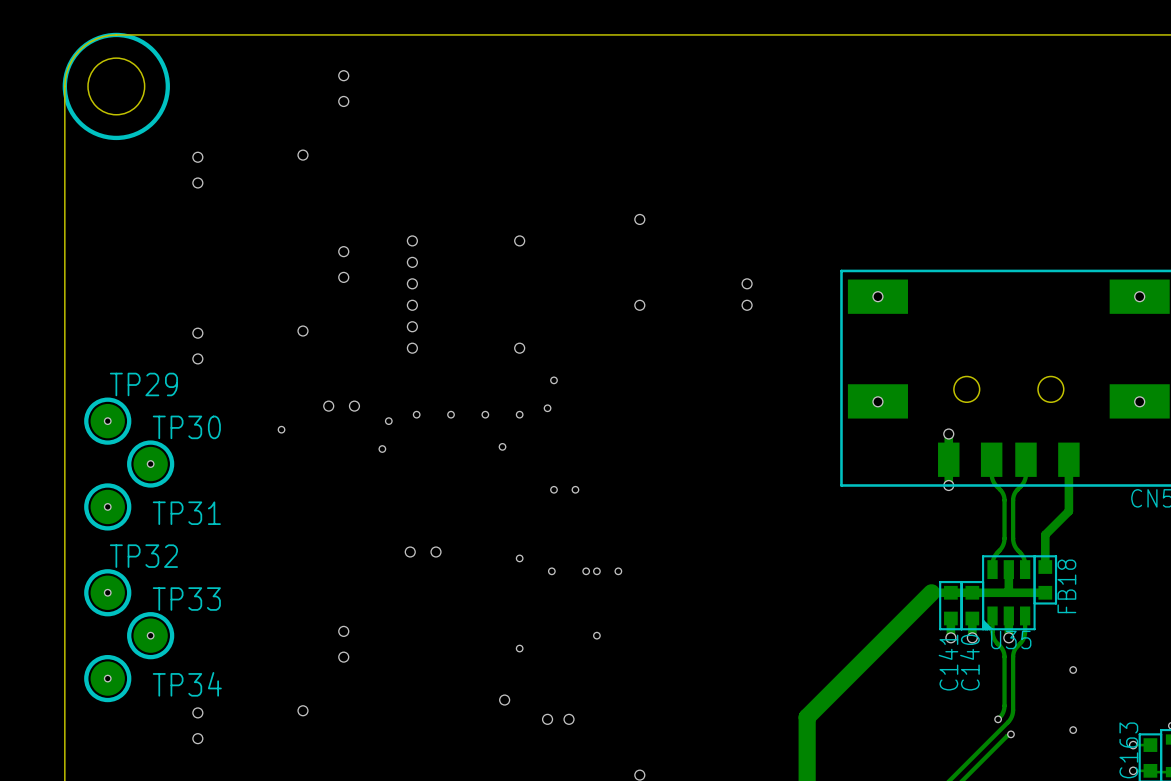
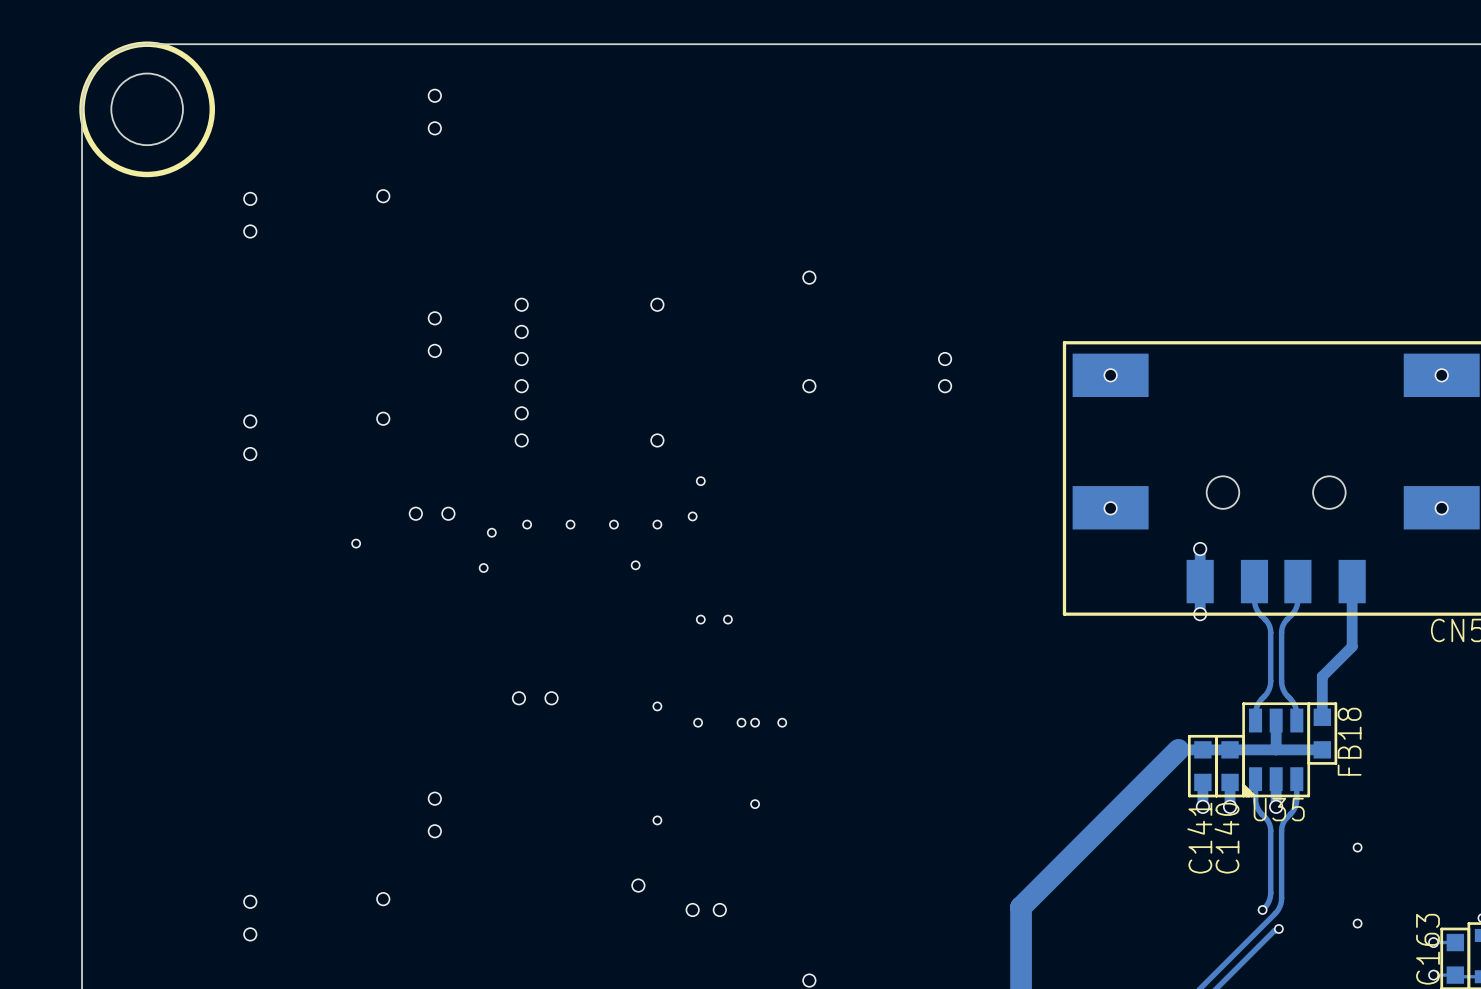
TP29: (107, 421) -> none
via: (107, 421) -> none
TP30: (150, 464) -> none
via: (150, 464) -> none
TP31: (107, 506) -> none
via: (107, 506) -> none
TP32: (107, 592) -> none
via: (107, 592) -> none
TP33: (150, 635) -> none
via: (150, 635) -> none
TP34: (107, 678) -> none
via: (107, 678) -> none

